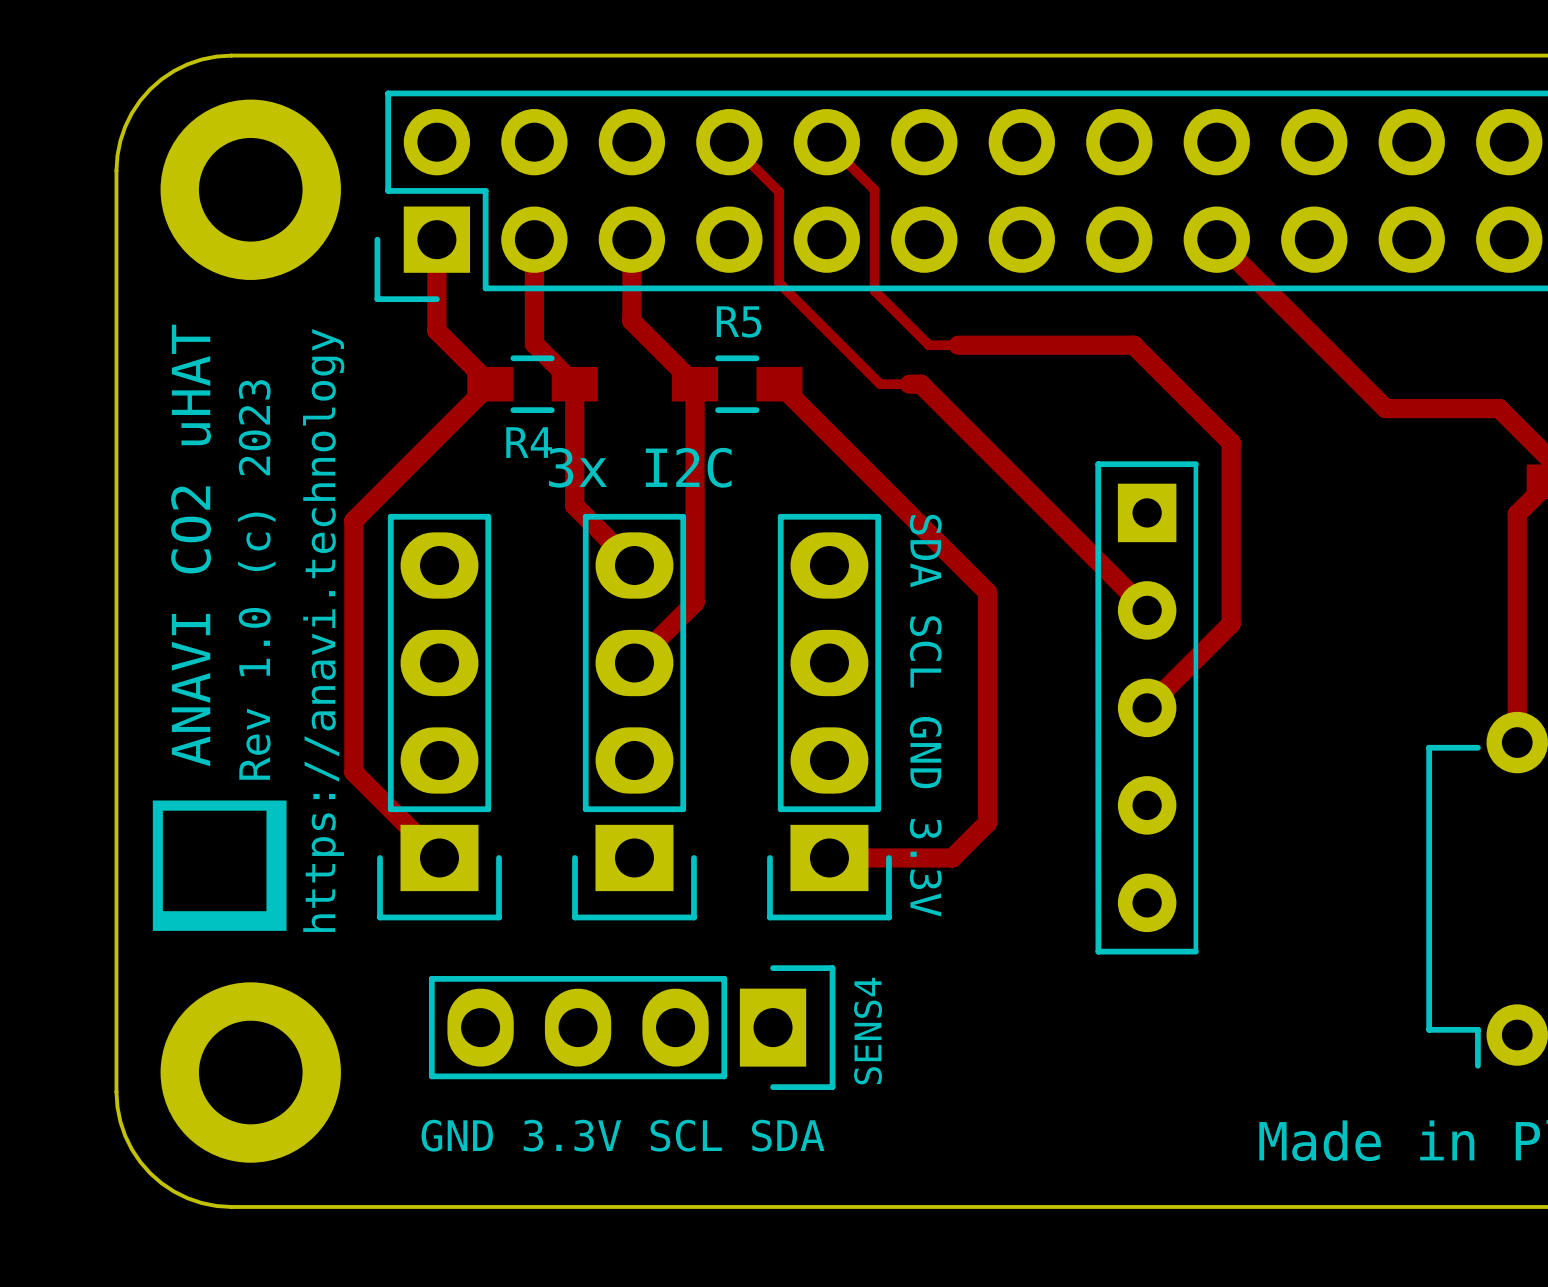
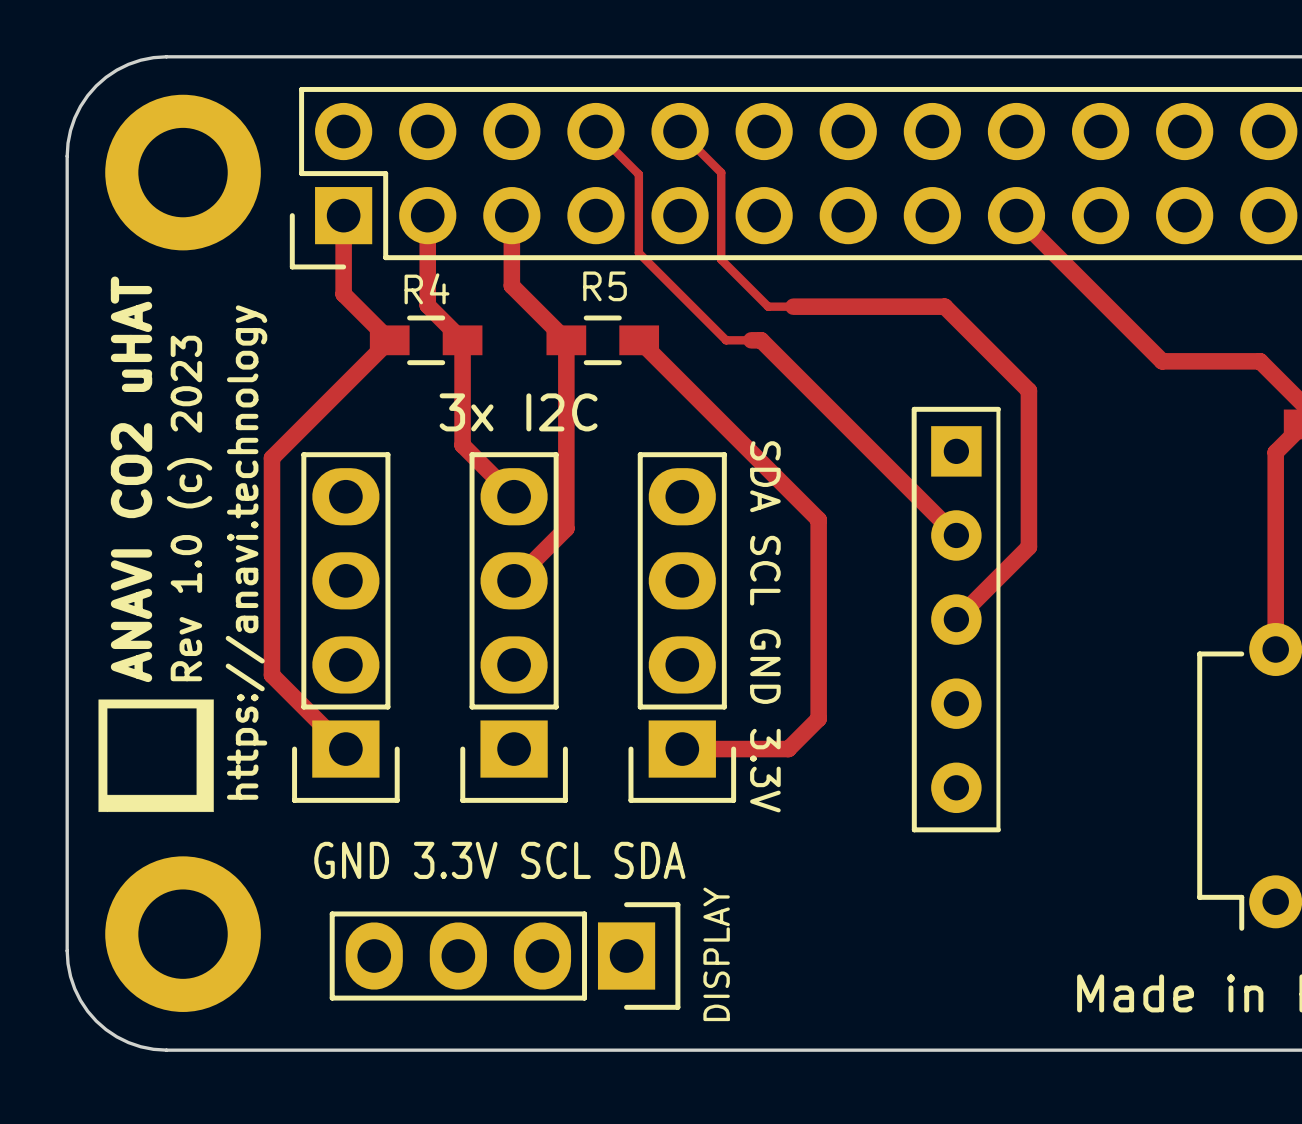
R4 name position: R4 (529, 442) -> R4 (427, 288)
SENS4: (632, 1027) -> none
DISPLAY: none -> (505, 956)
text position: GND 3.3V SCL SDA (623, 1135) -> GND 3.3V SCL SDA (499, 860)

